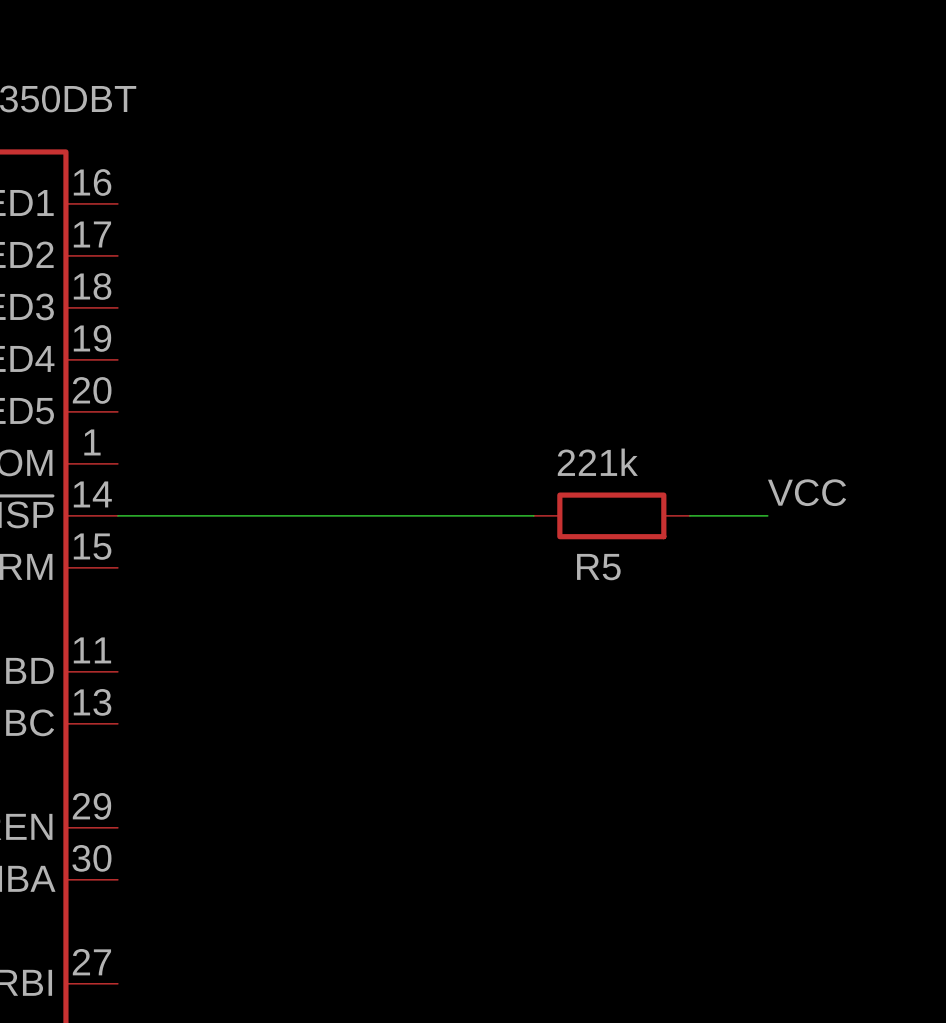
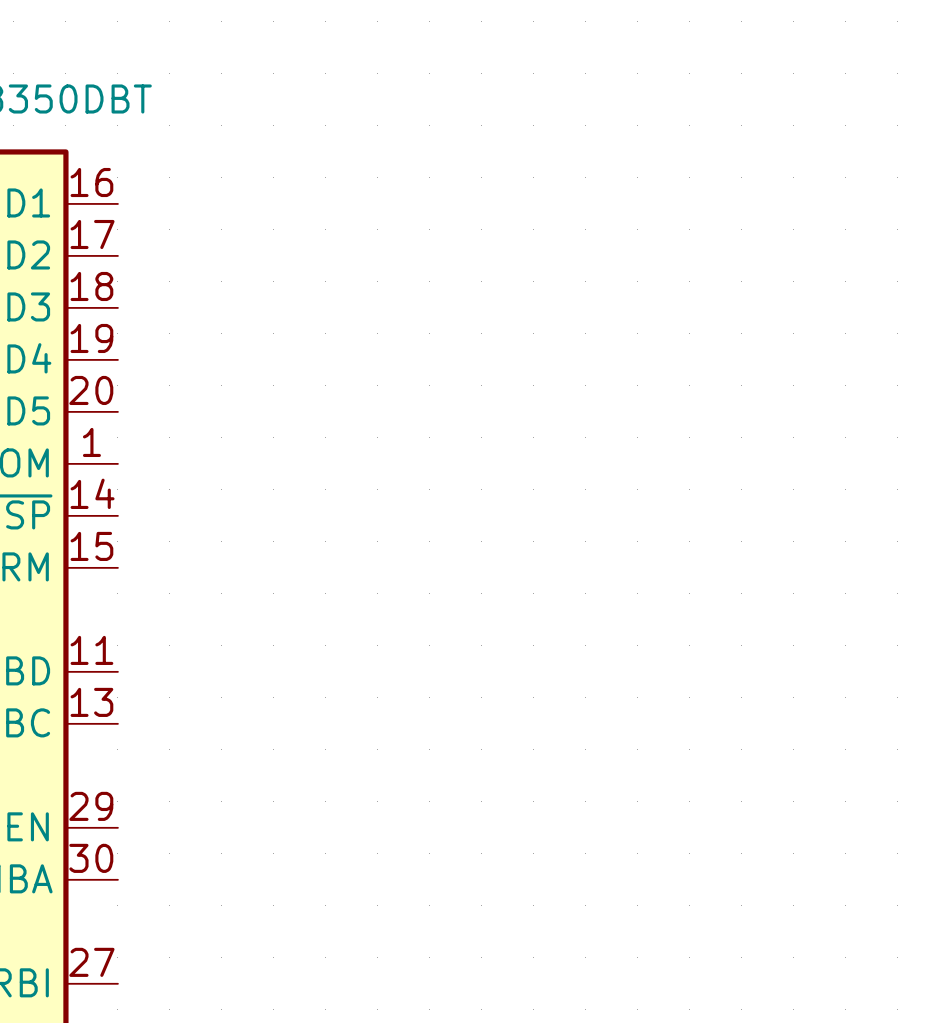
label: VCC (807, 492) -> none
wire: (117, 515) (533, 515) -> none
R5: 221k (611, 515) -> none
wire: (689, 515) (767, 515) -> none

